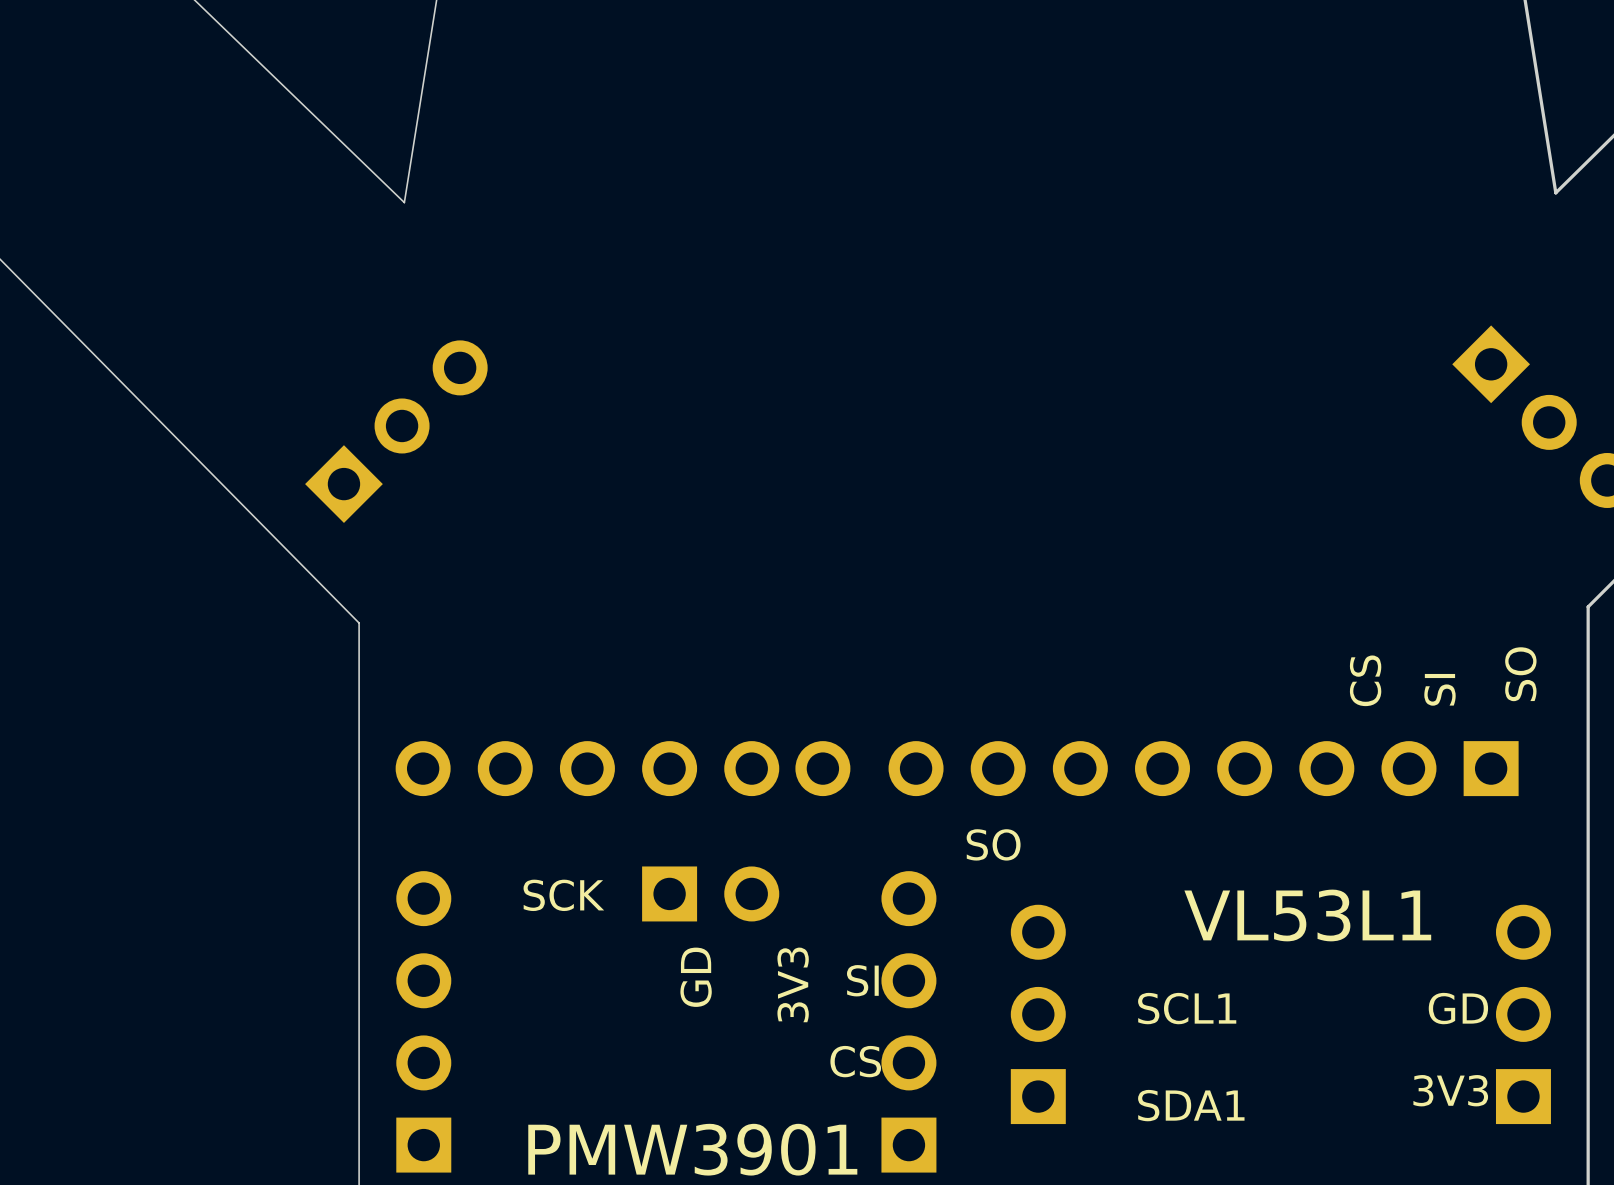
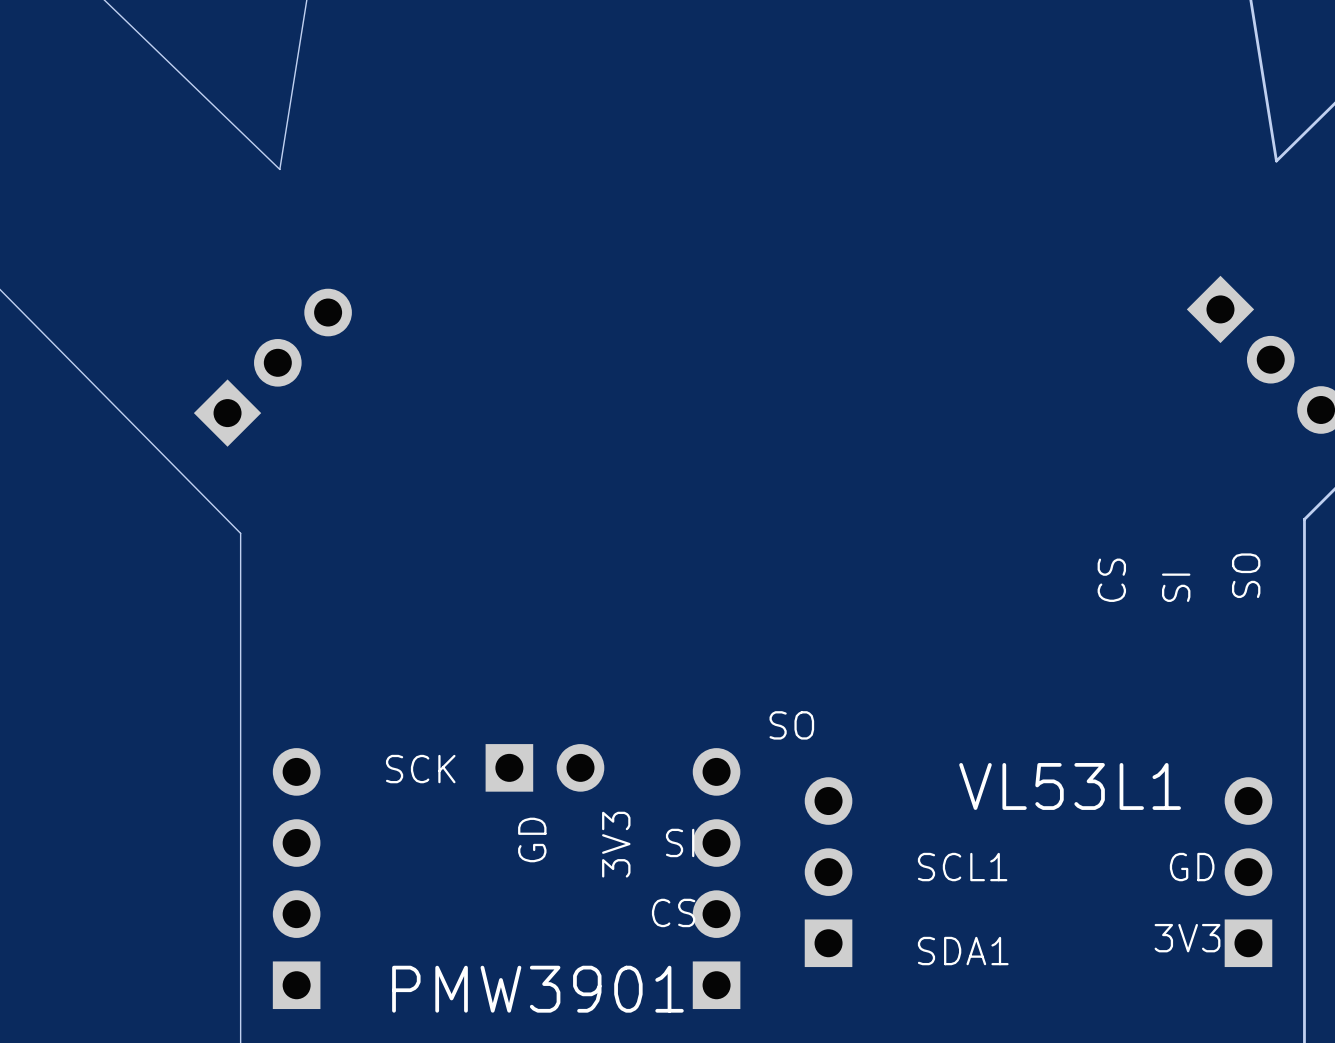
part: (957, 768) -> none

